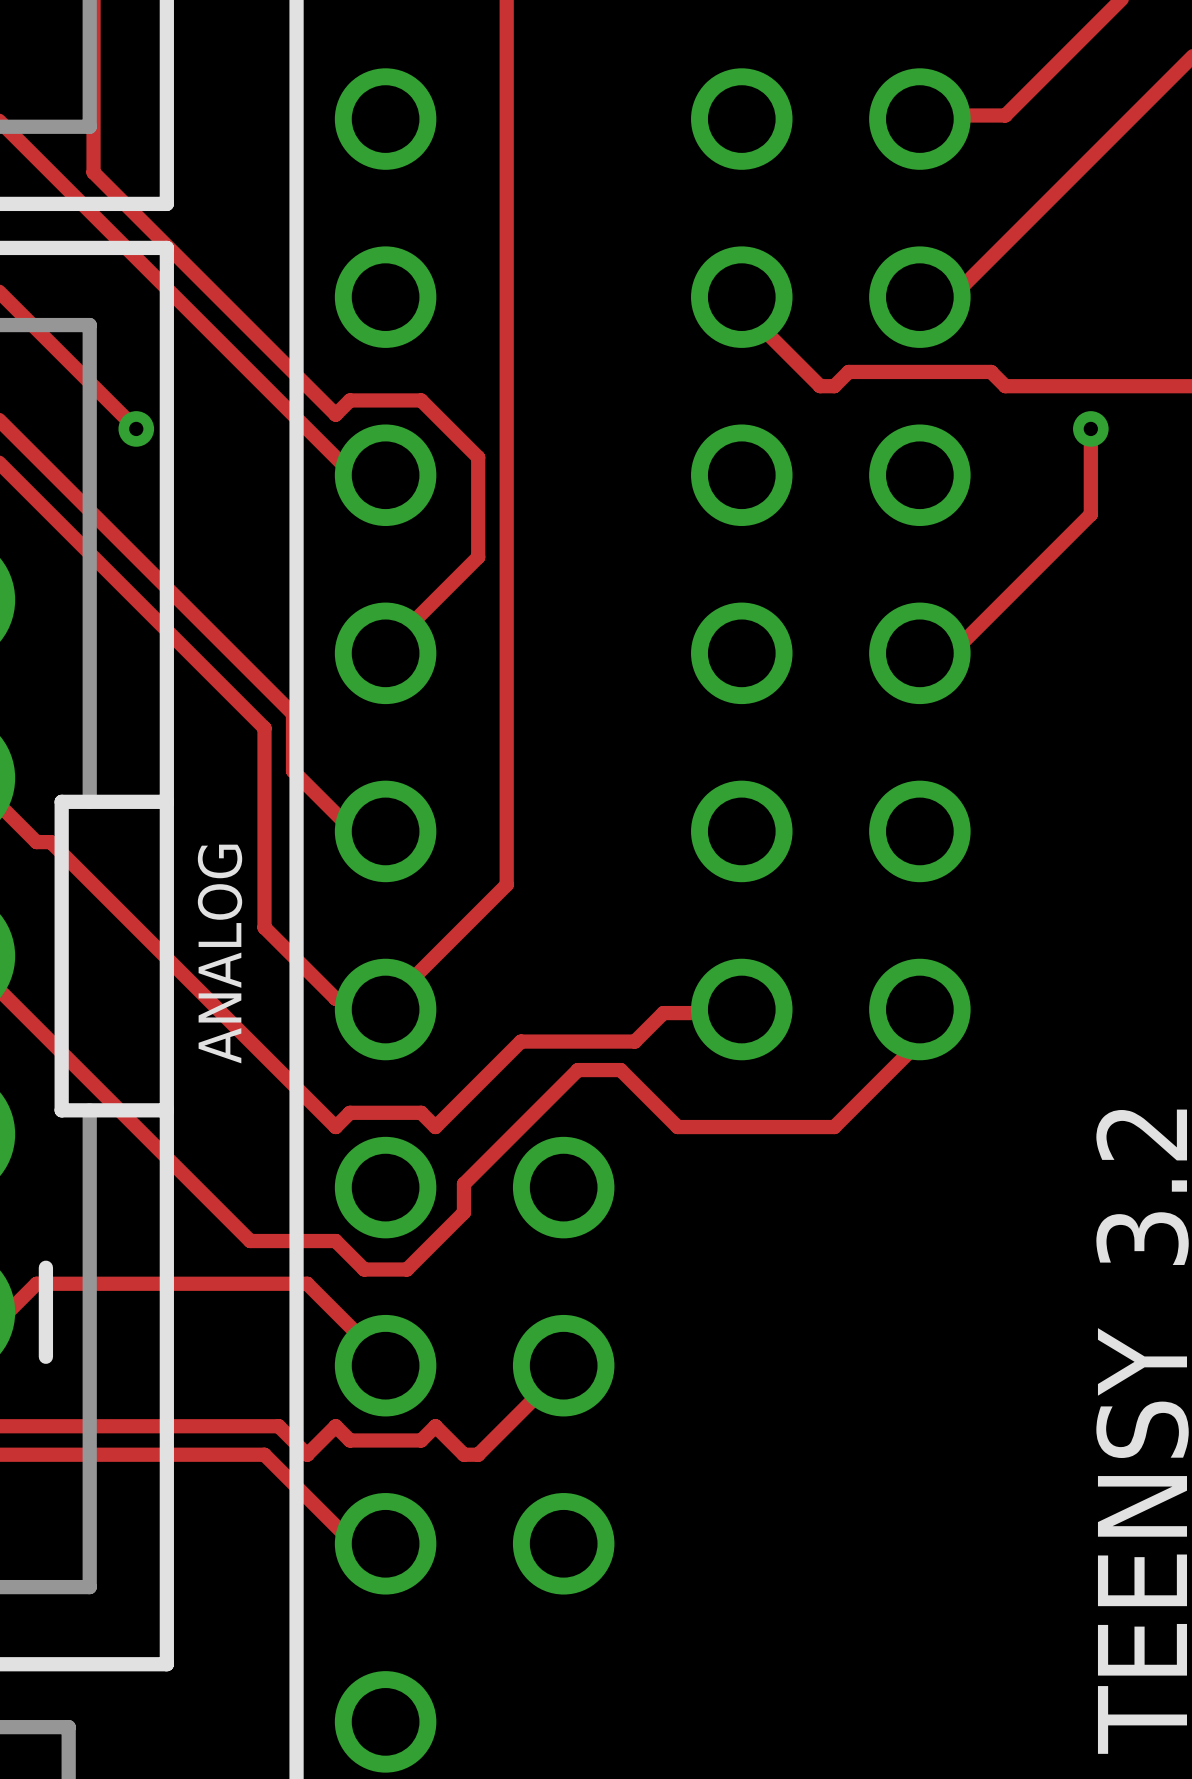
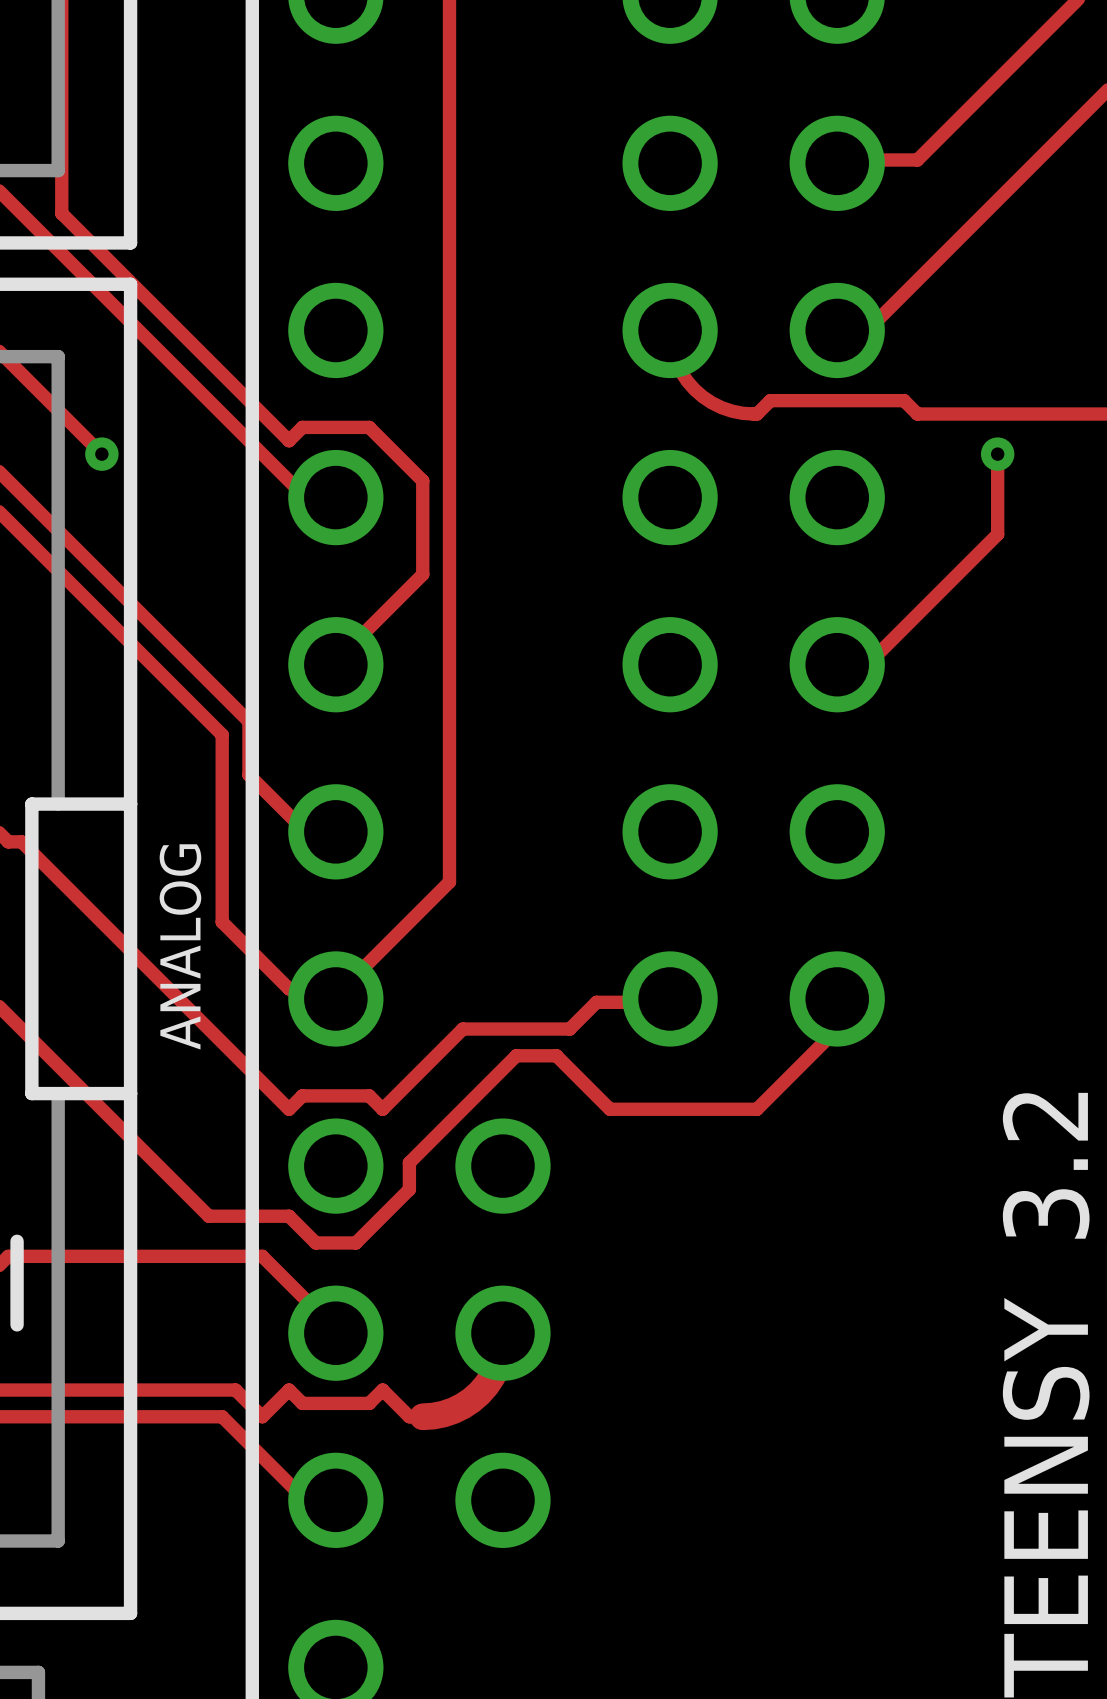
track: (741, 297) (748, 300) (748, 314) (820, 386) (830, 386) -> (670, 330) (676, 362) (694, 389) (721, 407) (753, 414)
track: (563, 1369) (478, 1454) -> (502, 1333) (502, 1347) (496, 1367) (479, 1393) (453, 1410) (422, 1416)

